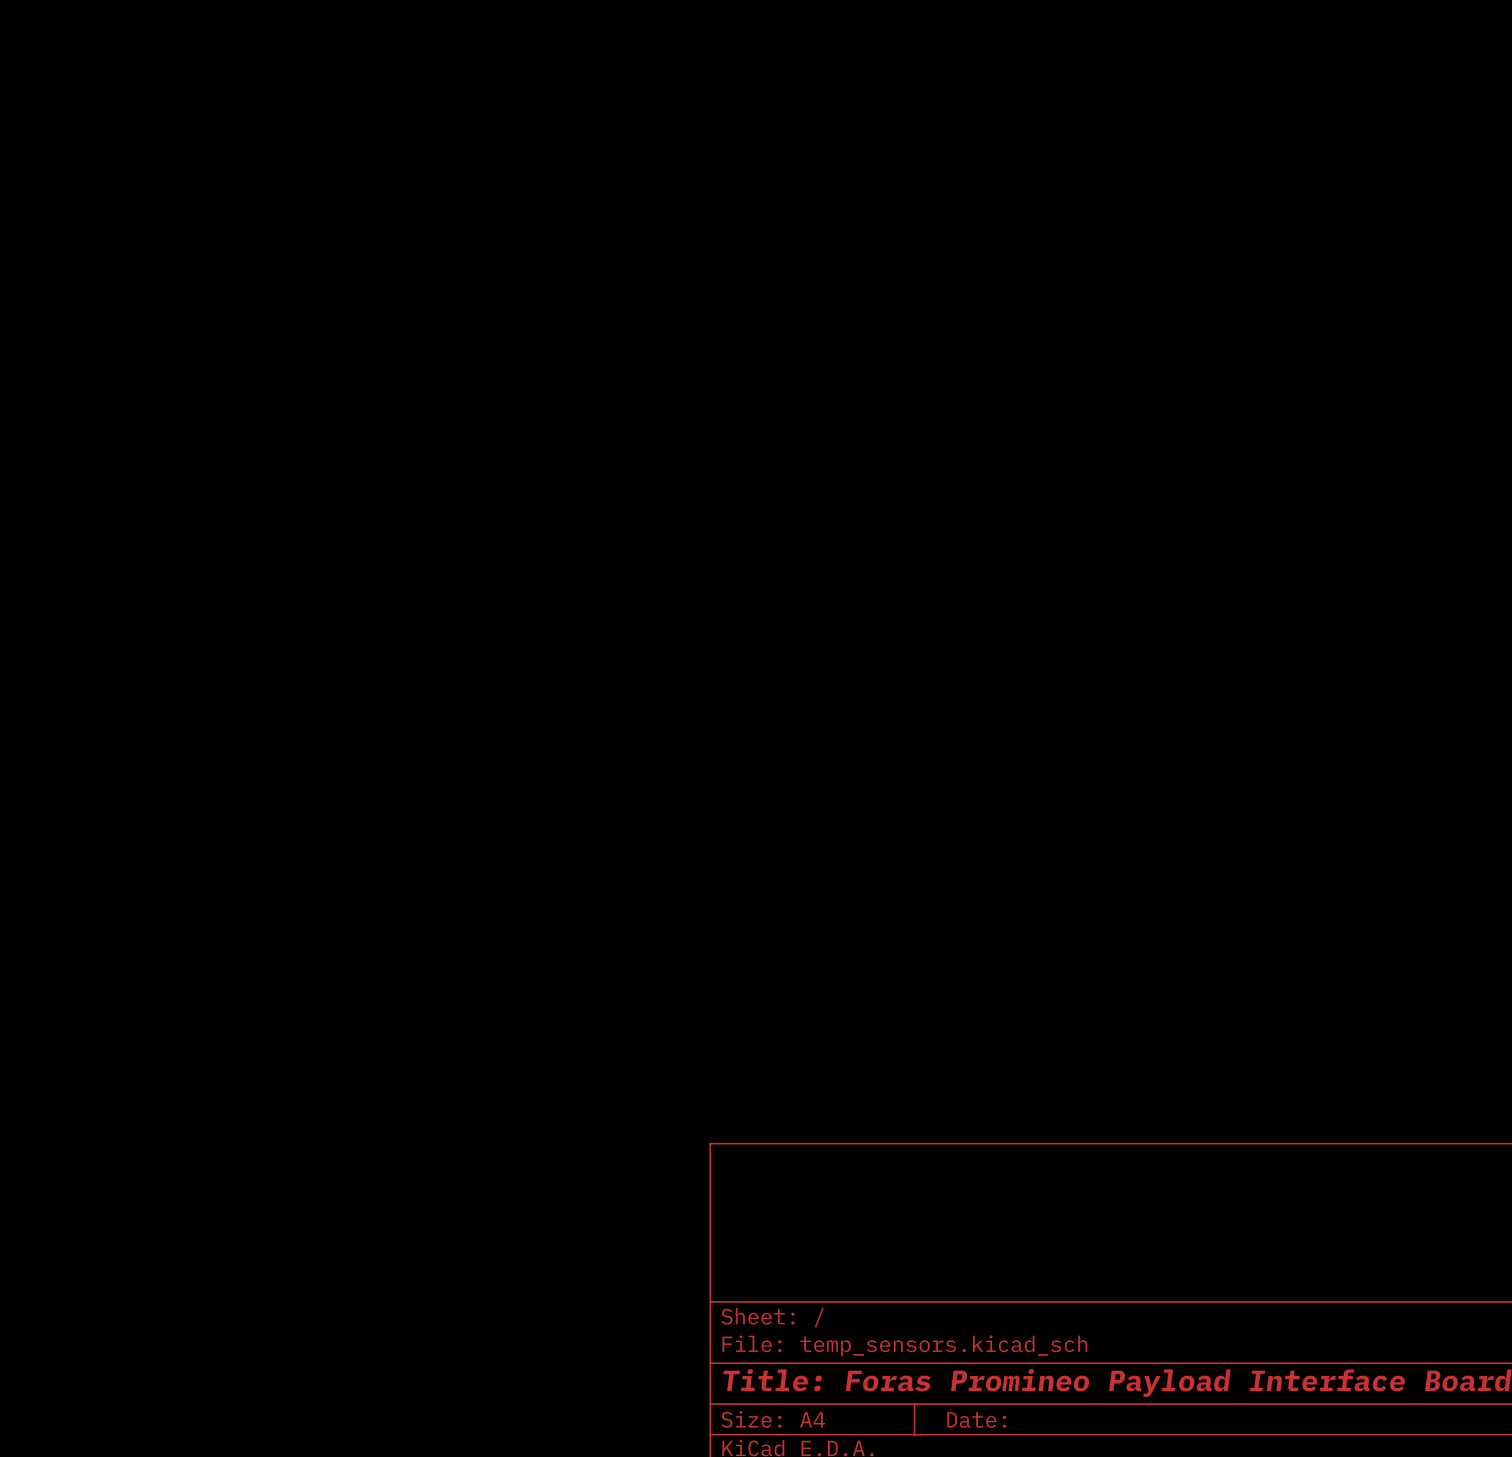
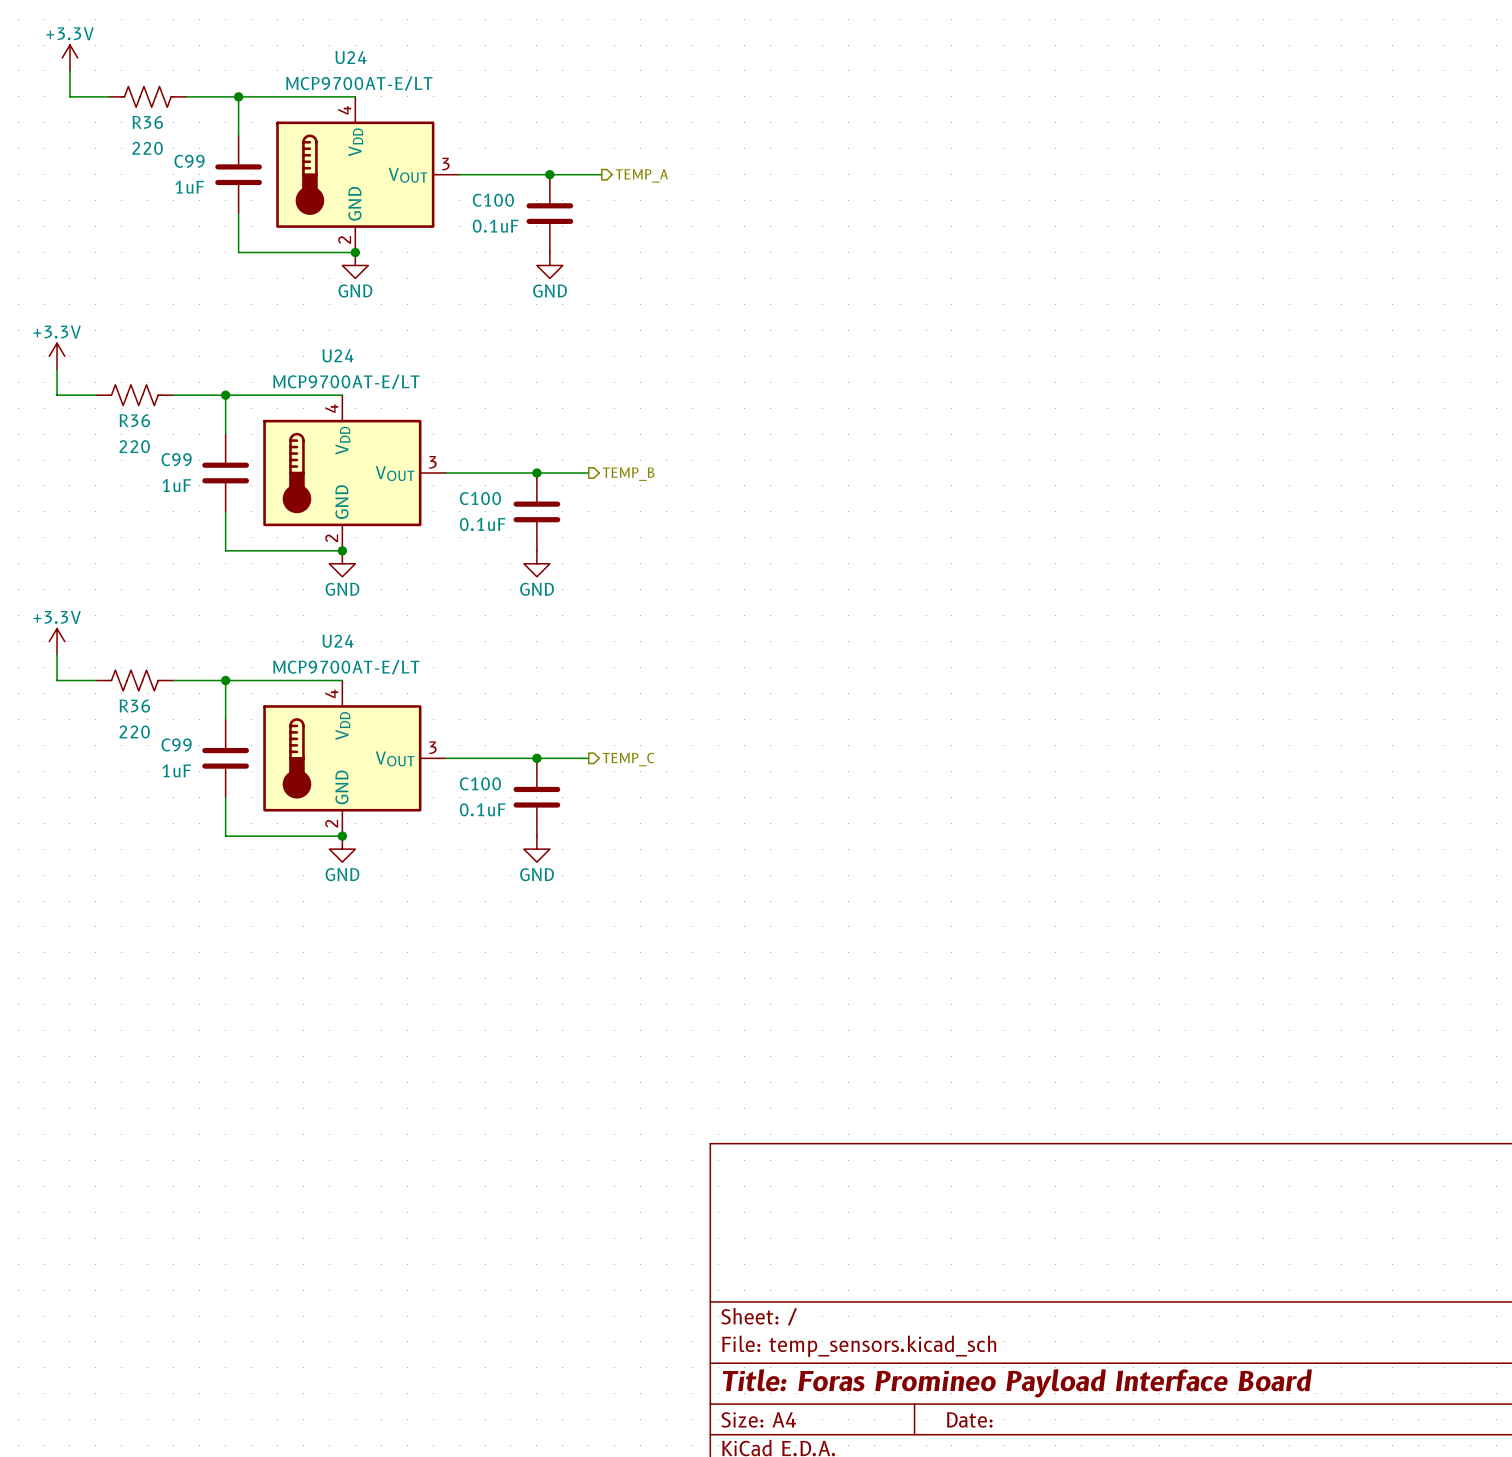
power symbol: none -> +3.3V (69, 57)
wire: none -> (69, 70) (69, 96) (108, 96)
R36: none -> 220 (147, 96)
wire: none -> (186, 96) (355, 96)
wire: none -> (238, 96) (238, 135)
junction: none -> (238, 96)
C99: none -> 1uF (238, 174)
U24: none -> MCP9700AT-E/LT (367, 174)
wire: none -> (459, 174) (601, 174)
junction: none -> (549, 174)
hierarchical label: none -> TEMP_A (641, 175)
wire: none -> (238, 213) (238, 252) (355, 252)
C100: none -> 0.1uF (549, 213)
junction: none -> (355, 252)
power symbol: none -> GND (355, 265)
power symbol: none -> GND (549, 265)
power symbol: none -> +3.3V (57, 356)
wire: none -> (57, 369) (57, 395) (95, 395)
R36: none -> 220 (134, 395)
wire: none -> (173, 395) (342, 395)
wire: none -> (225, 395) (225, 434)
junction: none -> (225, 395)
C99: none -> 1uF (225, 473)
U24: none -> MCP9700AT-E/LT (354, 473)
wire: none -> (446, 473) (588, 473)
junction: none -> (536, 473)
hierarchical label: none -> TEMP_B (628, 474)
wire: none -> (225, 511) (225, 550) (342, 550)
C100: none -> 0.1uF (536, 511)
junction: none -> (342, 550)
power symbol: none -> GND (342, 563)
power symbol: none -> GND (536, 563)
power symbol: none -> +3.3V (57, 641)
wire: none -> (57, 654) (57, 680) (95, 680)
R36: none -> 220 (134, 680)
wire: none -> (173, 680) (342, 680)
wire: none -> (225, 680) (225, 719)
junction: none -> (225, 680)
C99: none -> 1uF (225, 758)
U24: none -> MCP9700AT-E/LT (354, 758)
wire: none -> (446, 758) (588, 758)
junction: none -> (536, 758)
hierarchical label: none -> TEMP_C (628, 759)
wire: none -> (225, 797) (225, 836) (342, 836)
C100: none -> 0.1uF (536, 797)
junction: none -> (342, 836)
power symbol: none -> GND (342, 849)
power symbol: none -> GND (536, 849)

